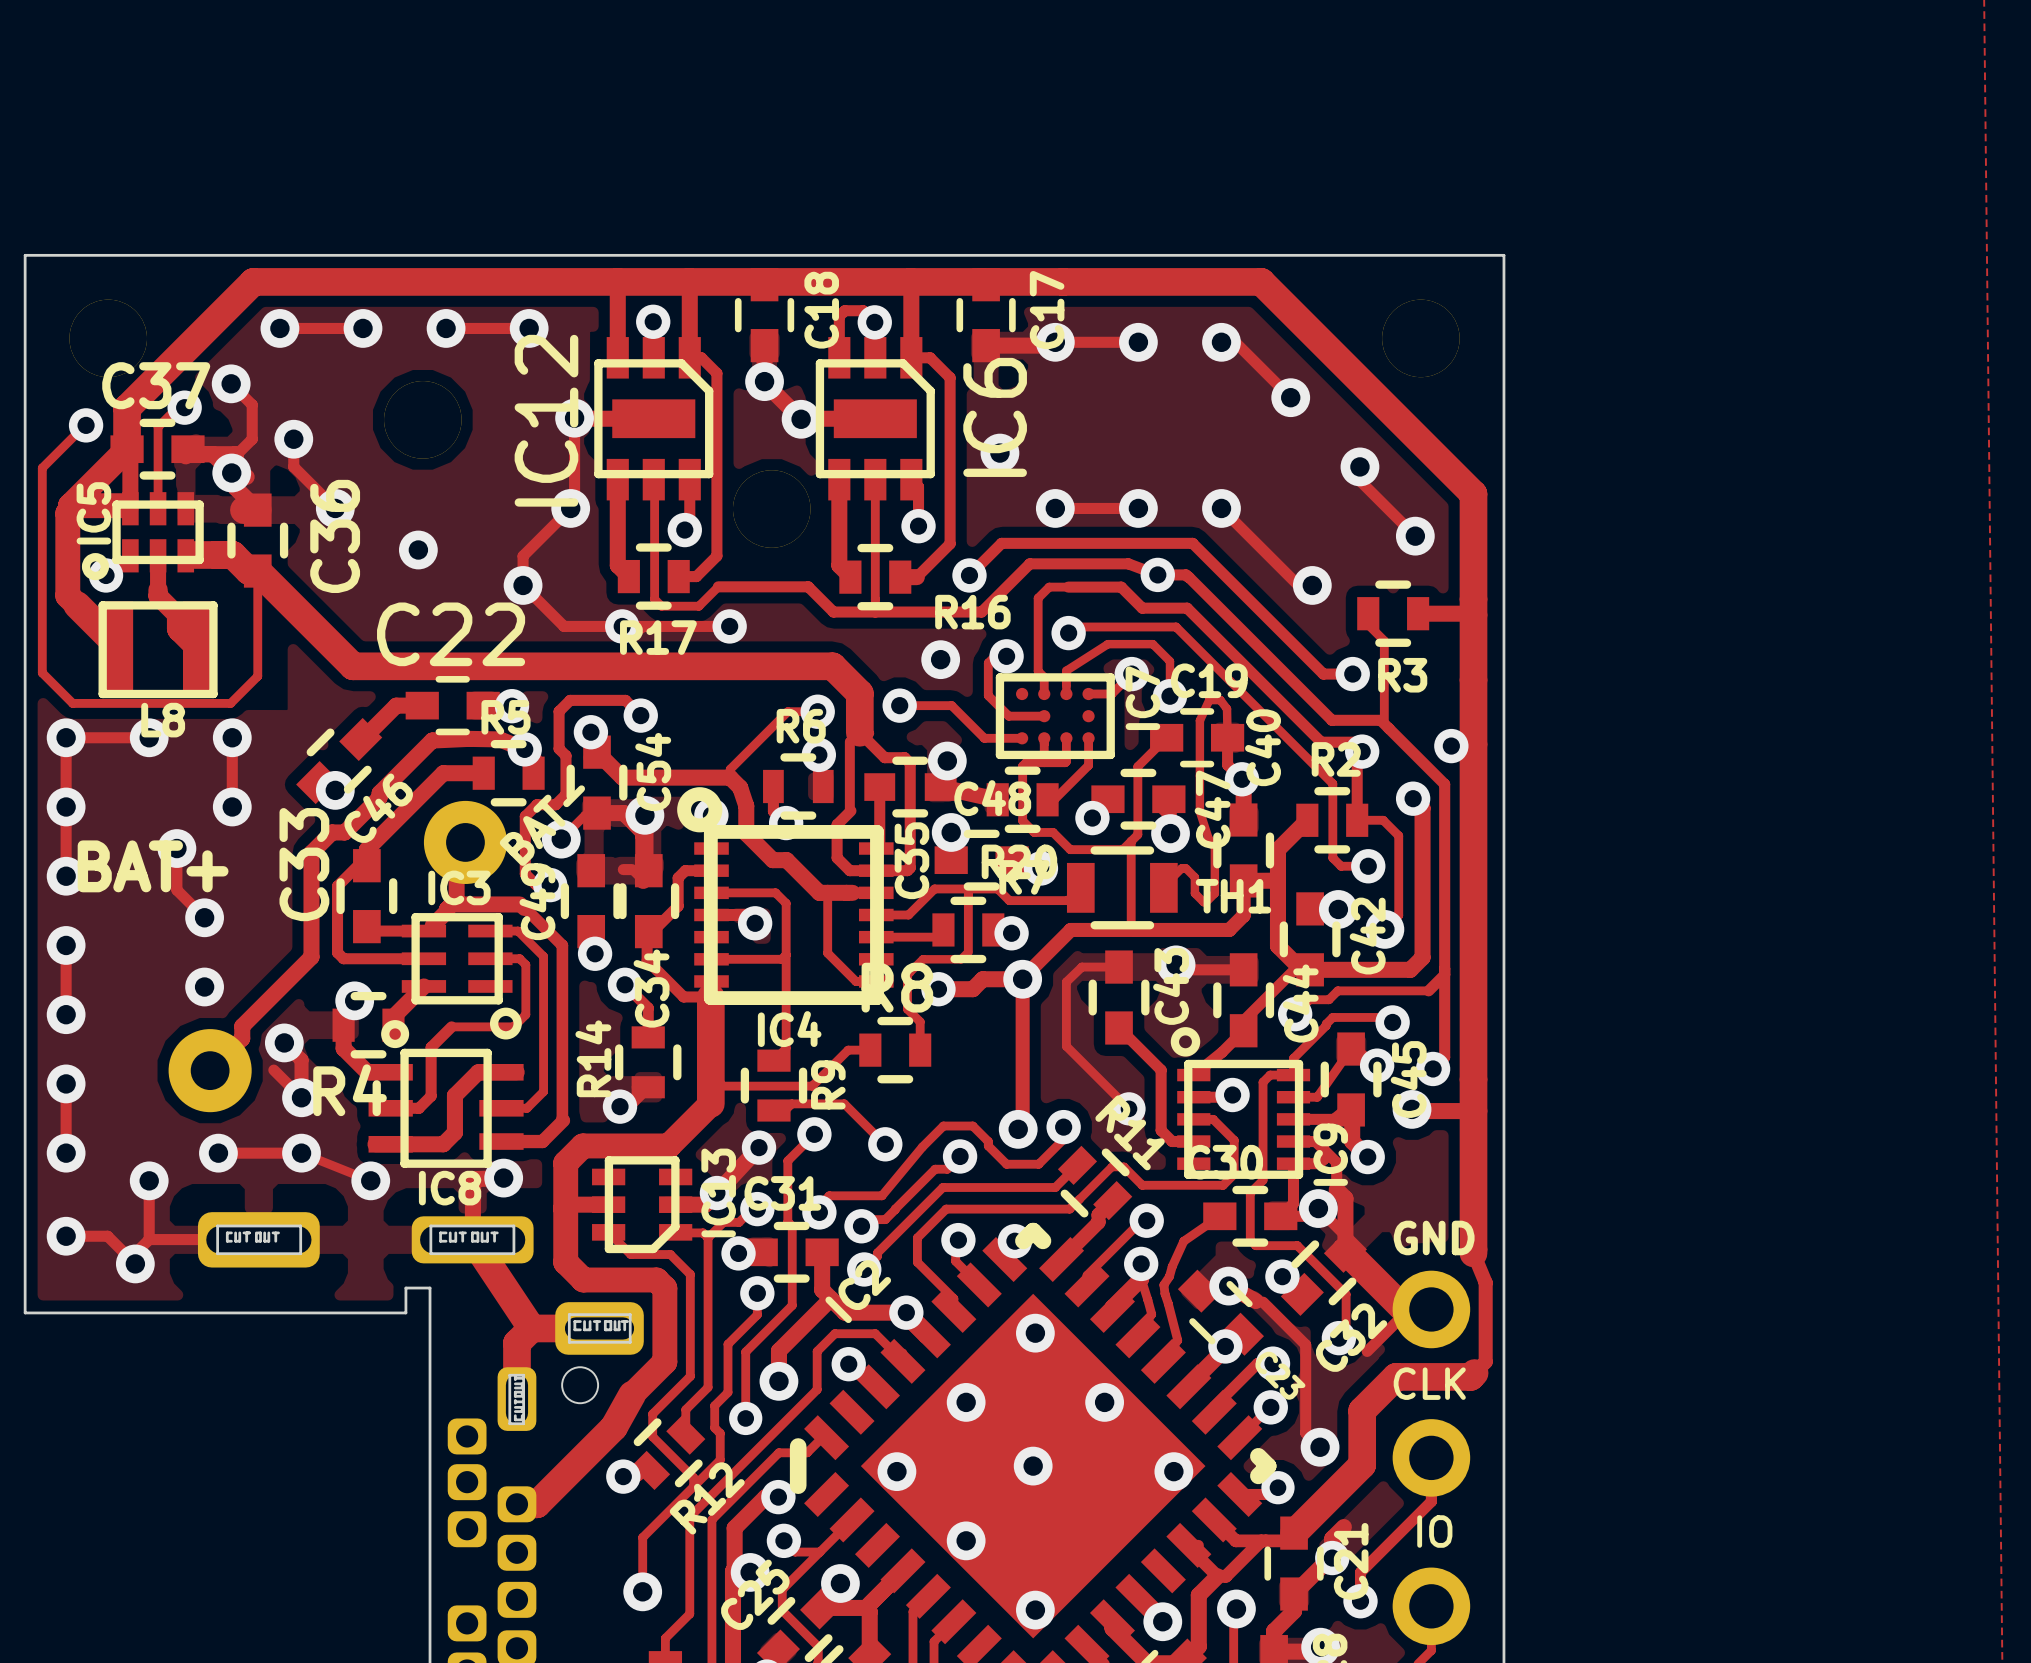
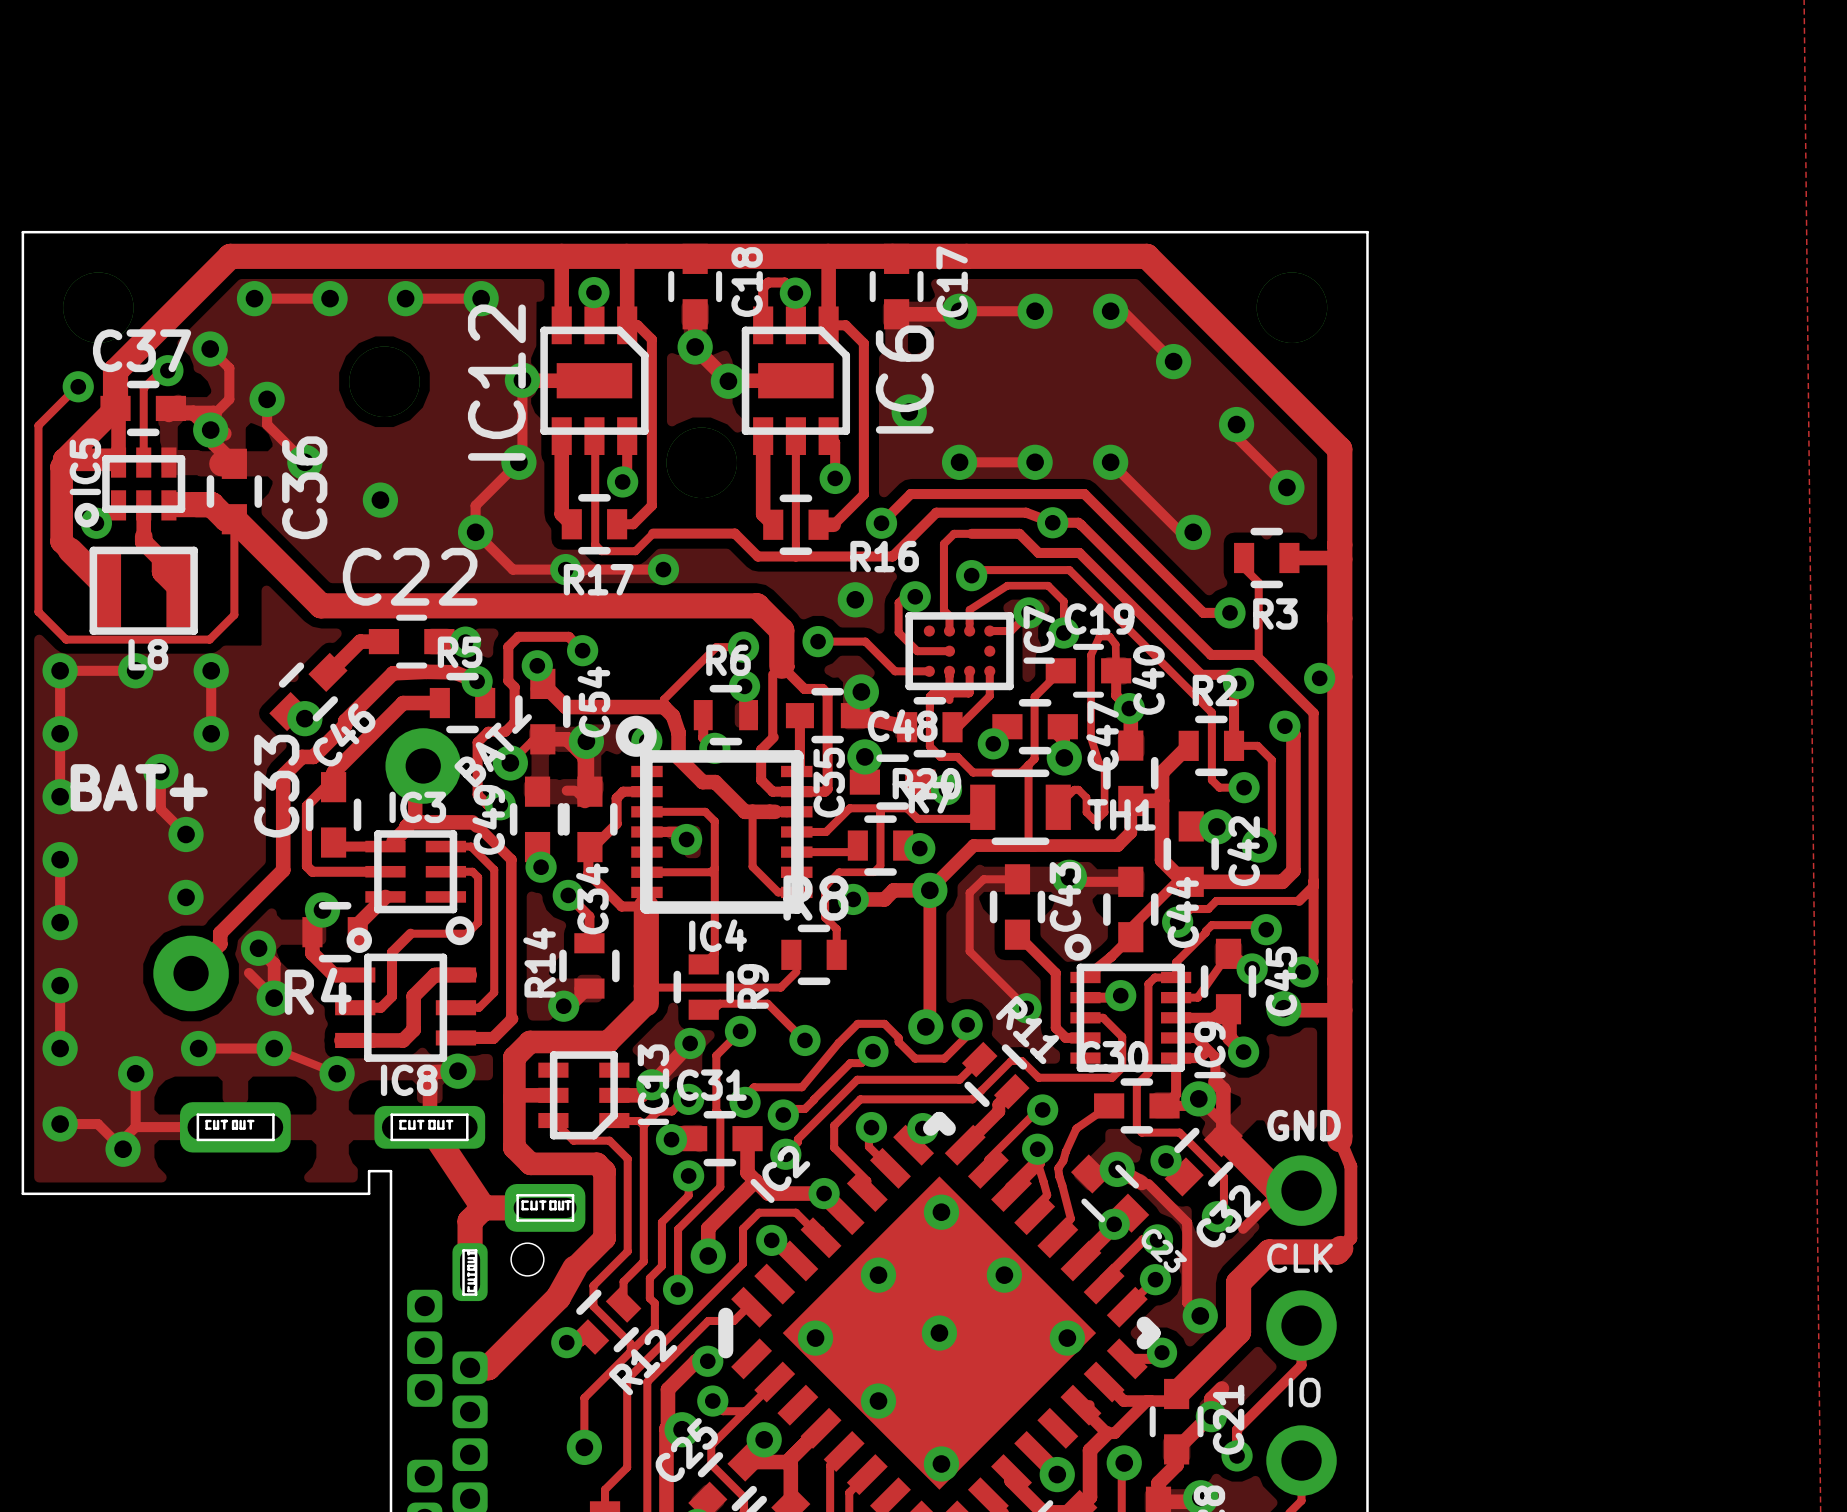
track: none -> (949, 693) (949, 700)
track: (870, 1050) (848, 1050) (812, 1086) -> (796, 971) (780, 987) (738, 987)

